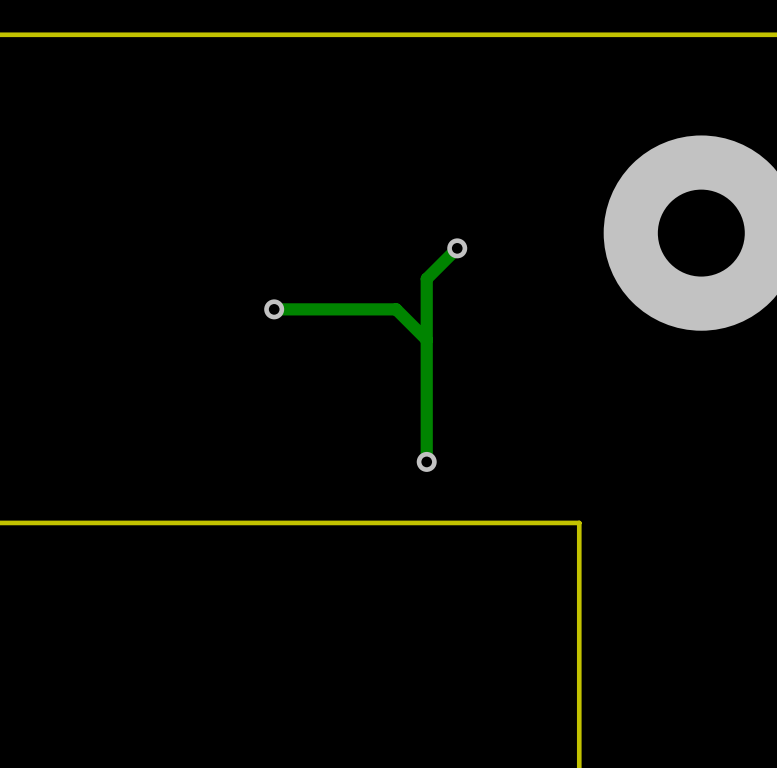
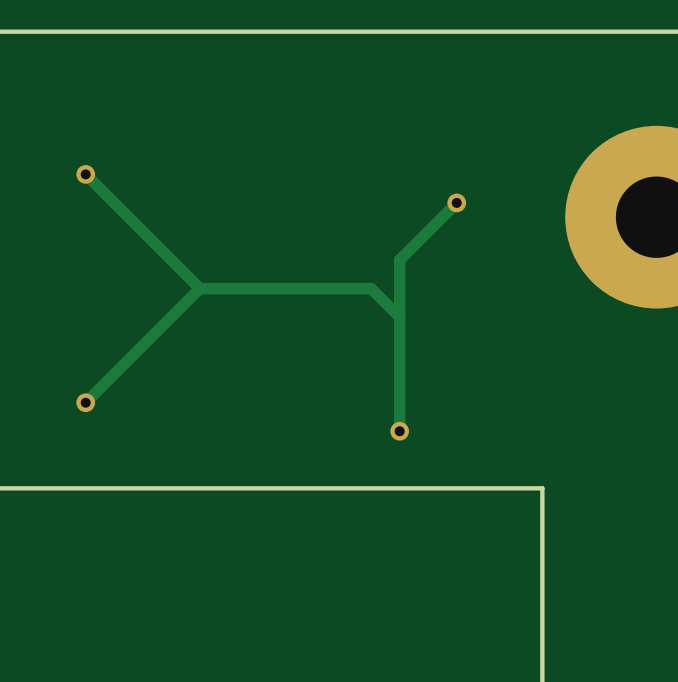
track: none -> (85, 174) (199, 288)
via: none -> (85, 174)
track: none -> (456, 202) (428, 231)
via position: (457, 248) -> (456, 202)
track: none -> (199, 288) (85, 402)
track: none -> (256, 288) (199, 288)
via: (274, 309) -> none
via: none -> (85, 402)

